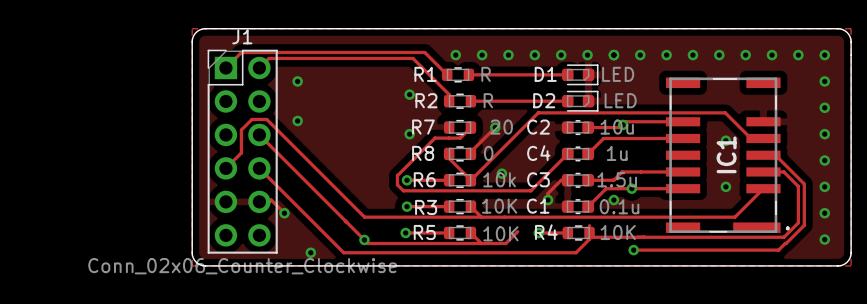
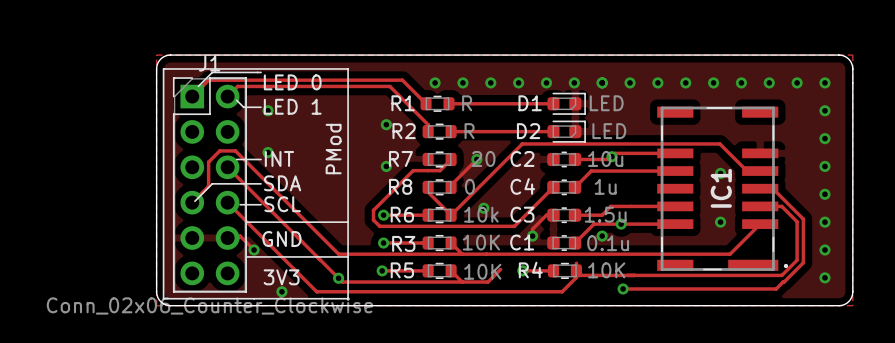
line: none -> (163, 68) (163, 298) (348, 298) (348, 68) (163, 68)
line: none -> (261, 72) (212, 72) (198, 86)
text: none -> LED 0 (292, 82)
line: none -> (236, 100) (243, 107) (261, 107)
text: none -> LED 1 (292, 106)
text: none -> PMod (333, 149)
line: none -> (236, 159) (261, 159)
text: none -> INT (279, 158)
line: none -> (261, 183) (212, 183) (194, 201)
text: none -> SDA (282, 183)
text: none -> SCL (282, 204)
line: none -> (240, 204) (261, 204)
line: none -> (247, 222) (348, 222)
text: none -> GND (281, 239)
line: none -> (247, 256) (348, 256)
text: none -> 3V3 (281, 277)

